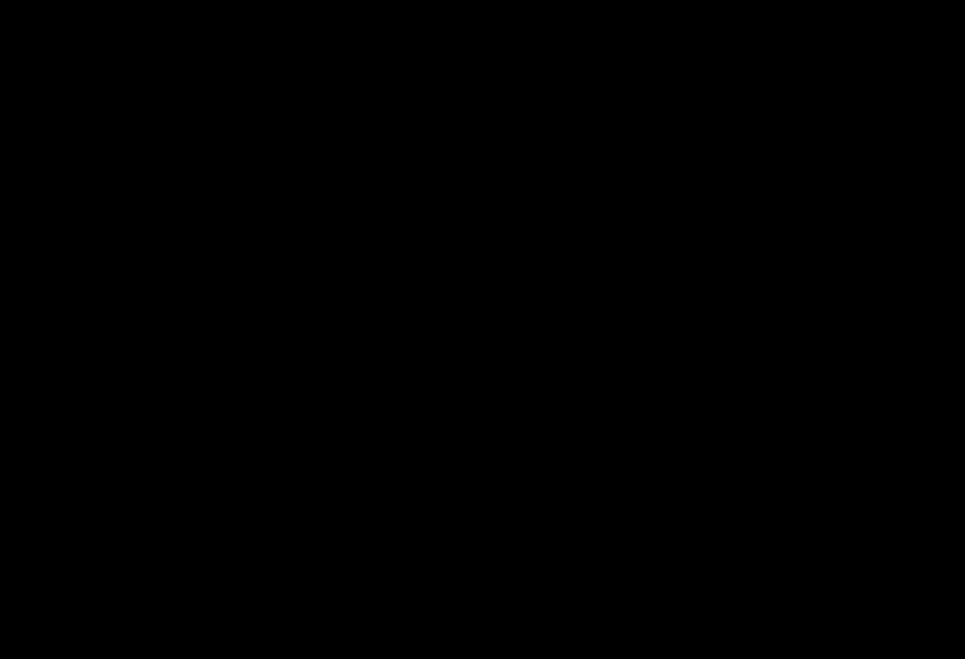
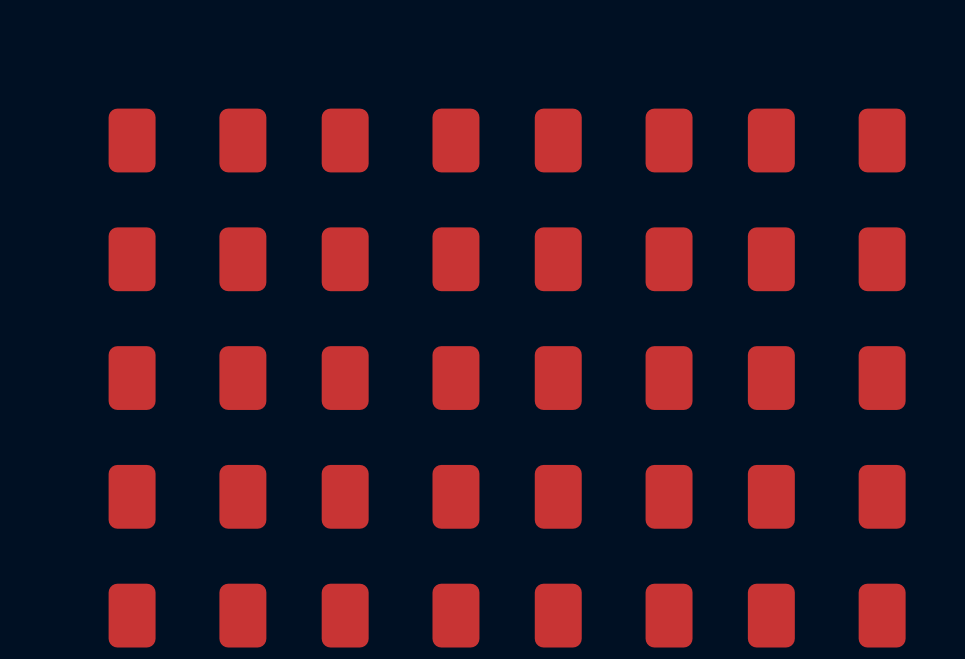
part: none -> (187, 140)
part: none -> (400, 140)
part: none -> (613, 140)
part: none -> (826, 140)
part: none -> (187, 259)
part: none -> (400, 259)
part: none -> (613, 259)
part: none -> (826, 259)
part: none -> (187, 378)
part: none -> (400, 378)
part: none -> (613, 378)
part: none -> (826, 378)
part: none -> (187, 496)
part: none -> (400, 496)
part: none -> (613, 496)
part: none -> (826, 496)
part: none -> (187, 615)
part: none -> (400, 615)
part: none -> (613, 615)
part: none -> (826, 615)

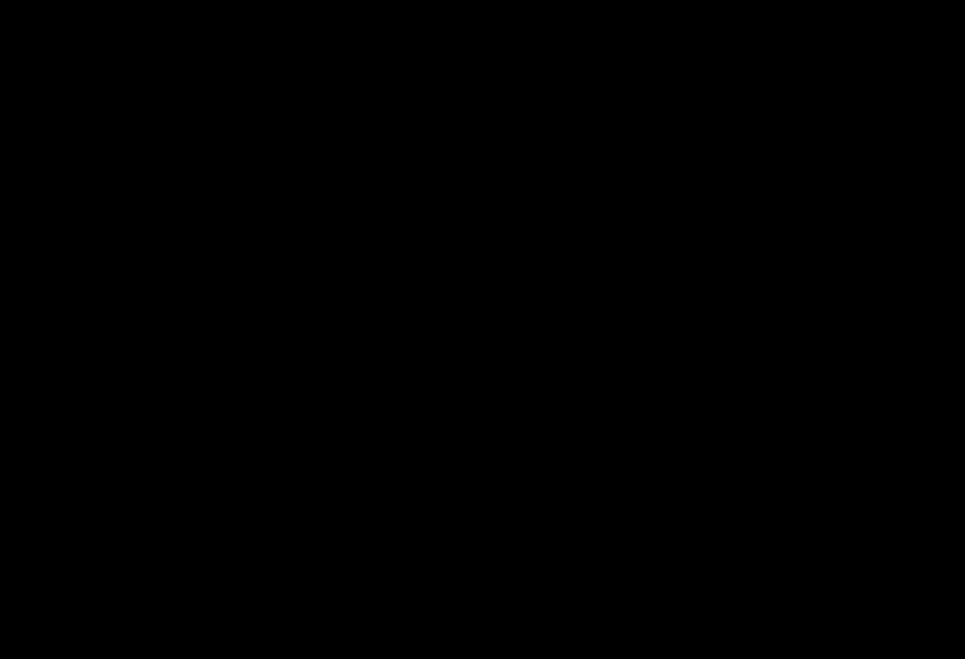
part: (187, 140) -> none
part: (400, 140) -> none
part: (613, 140) -> none
part: (826, 140) -> none
part: (187, 259) -> none
part: (400, 259) -> none
part: (613, 259) -> none
part: (826, 259) -> none
part: (187, 378) -> none
part: (400, 378) -> none
part: (613, 378) -> none
part: (826, 378) -> none
part: (187, 496) -> none
part: (400, 496) -> none
part: (613, 496) -> none
part: (826, 496) -> none
part: (187, 615) -> none
part: (400, 615) -> none
part: (613, 615) -> none
part: (826, 615) -> none

